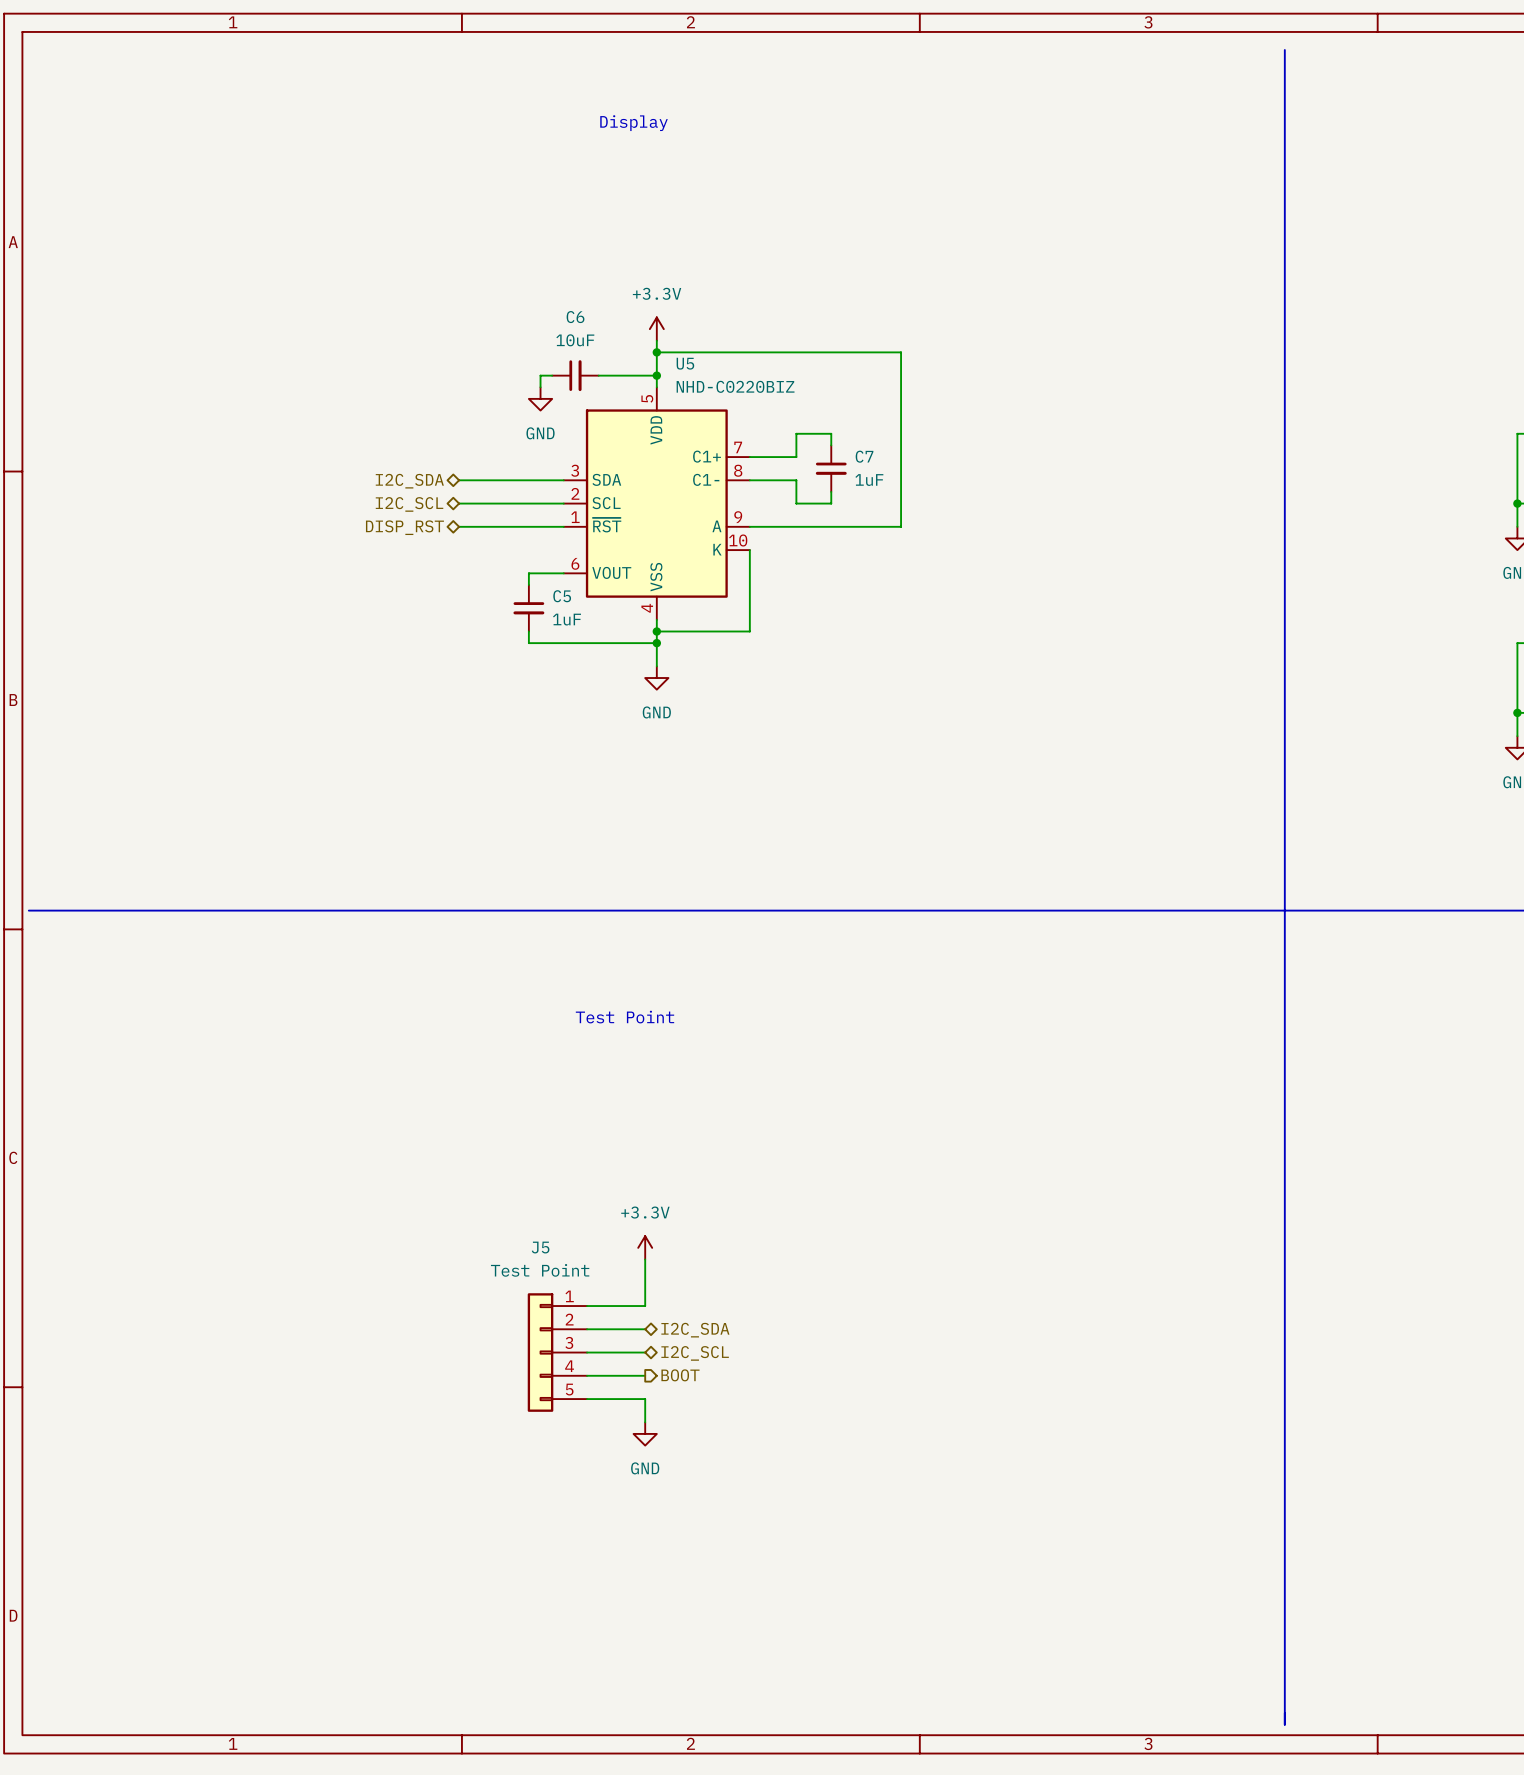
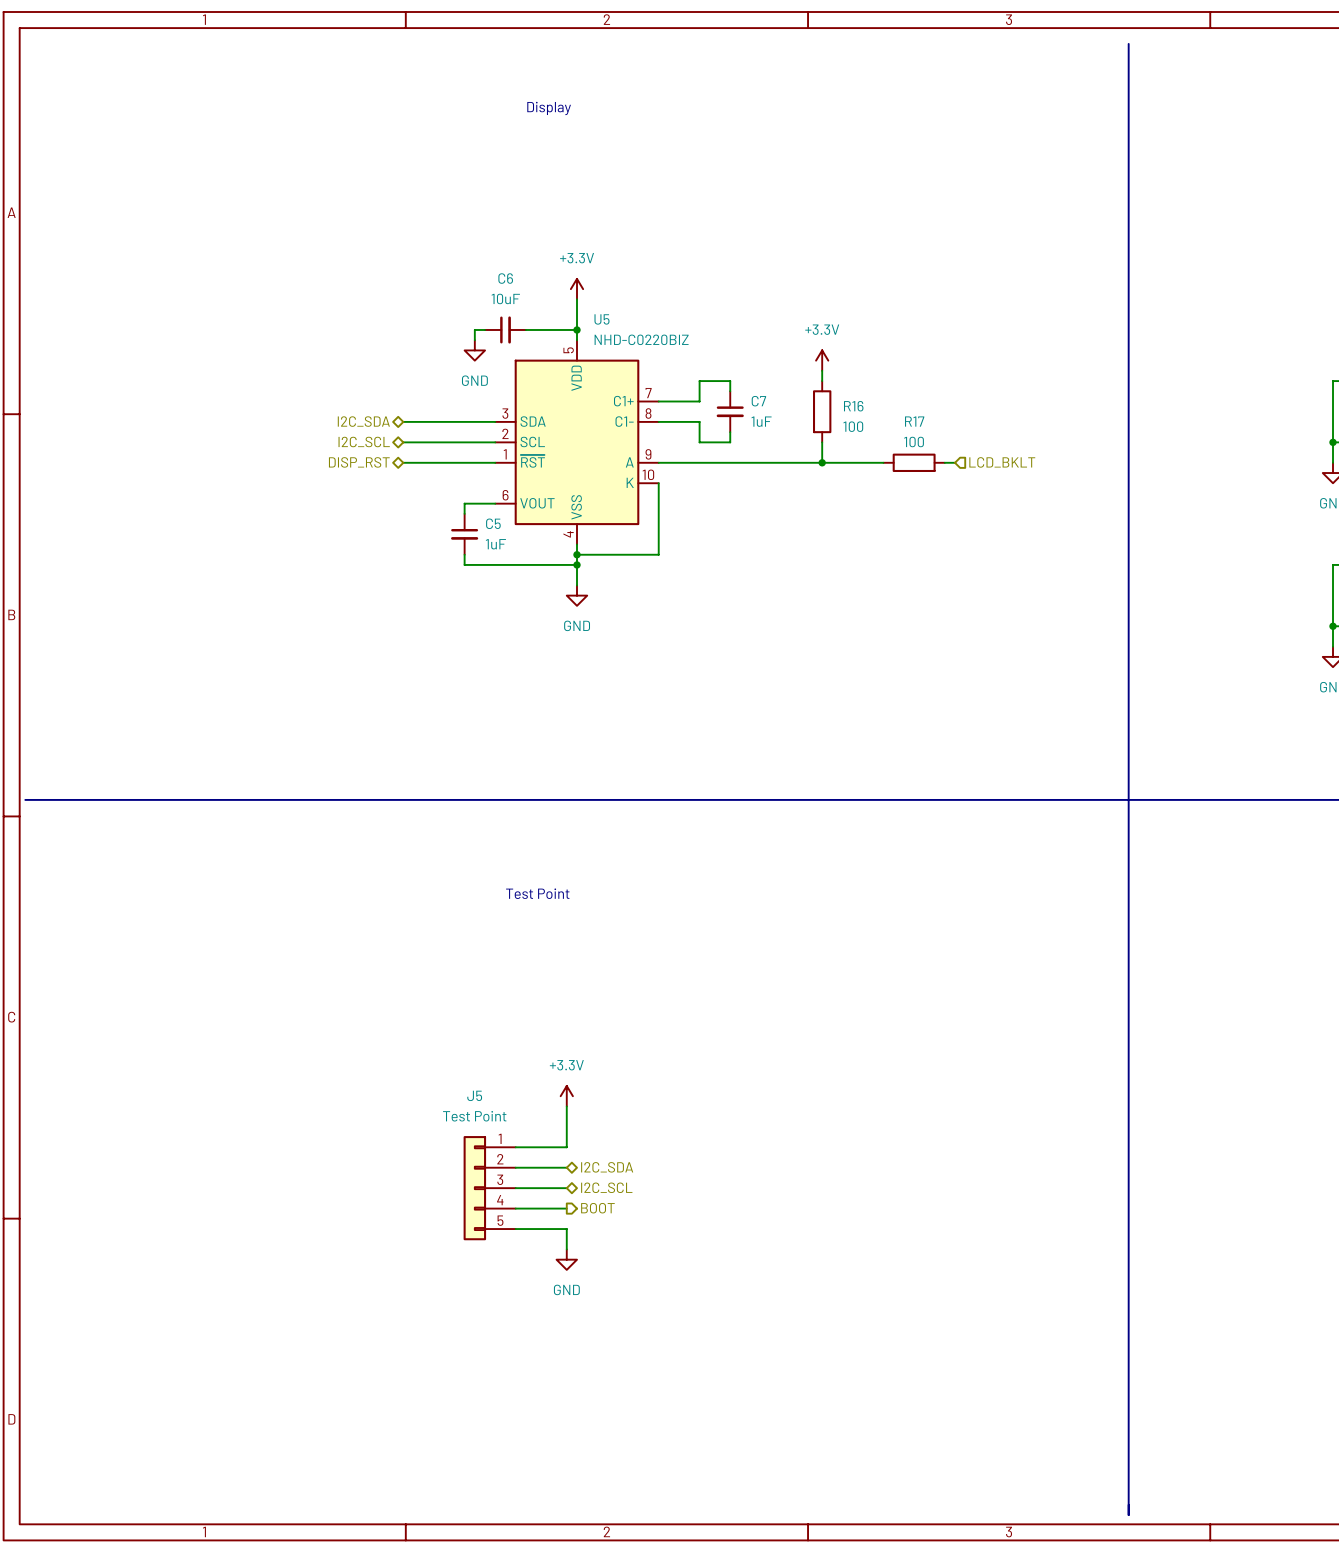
wire: (656, 352) (901, 352) (901, 526) -> (883, 462) (791, 462)
junction: (656, 352) -> none
power symbol: none -> +3.3V (822, 360)
wire: none -> (822, 370) (822, 381)
R16: none -> 100 (822, 411)
wire: none -> (822, 442) (822, 462)
junction: none -> (822, 462)
R17: none -> 100 (914, 462)
wire: none -> (944, 462) (955, 462)
hierarchical label: none -> LCD_BKLT (1002, 462)

